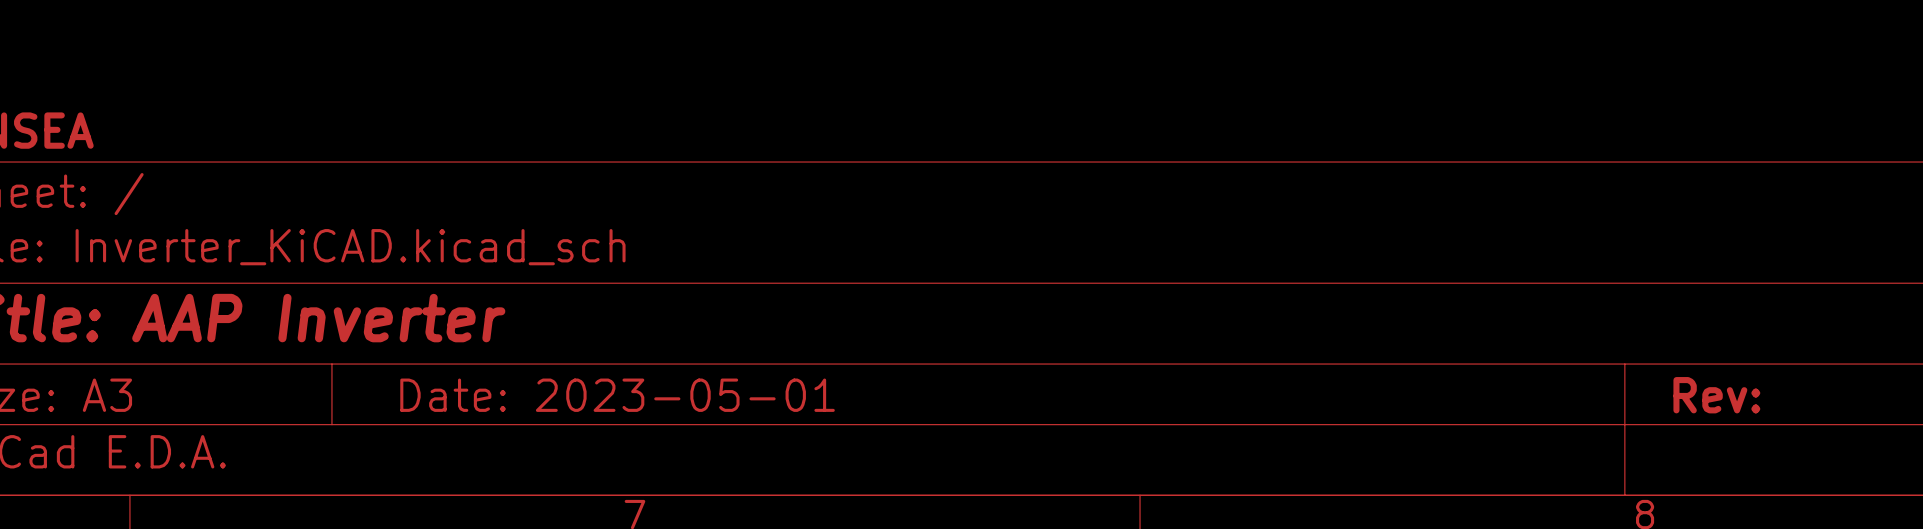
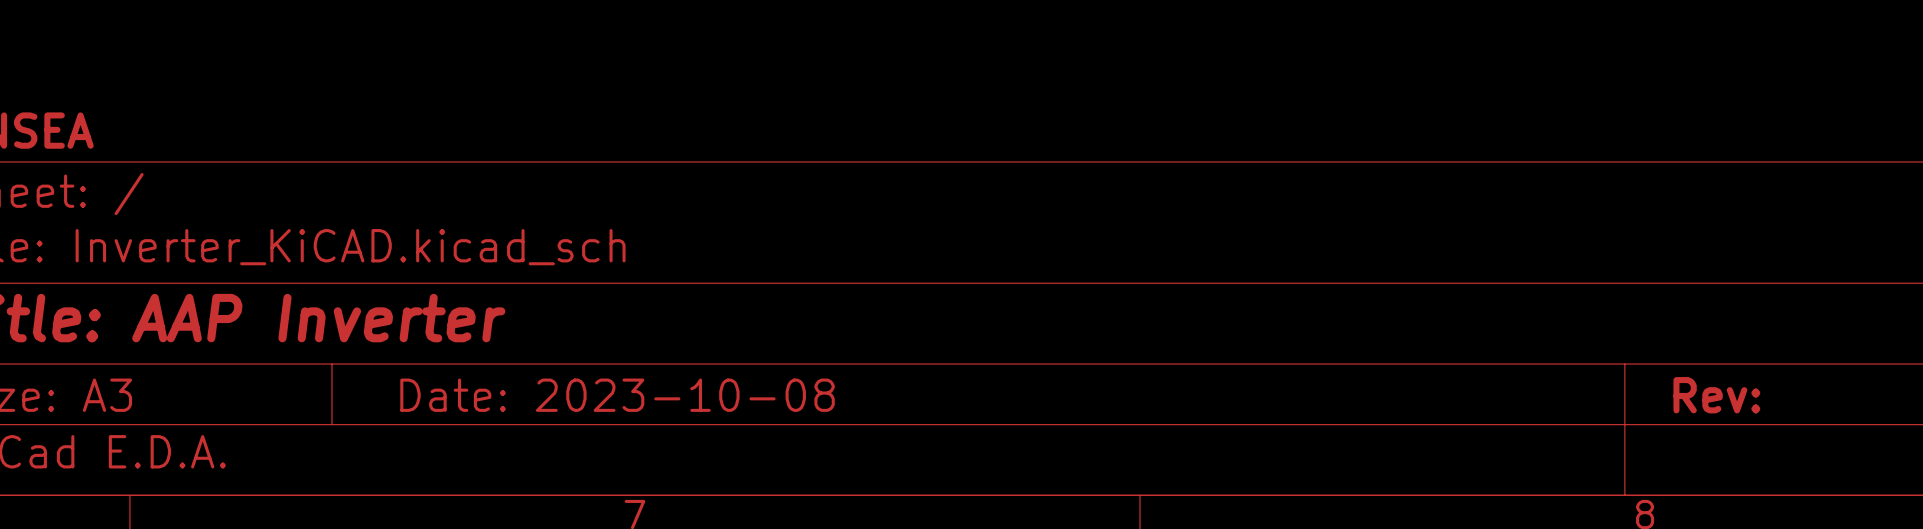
title block: Date: 2023-05-01 (617, 395) -> Date: 2023-10-08 (617, 395)

